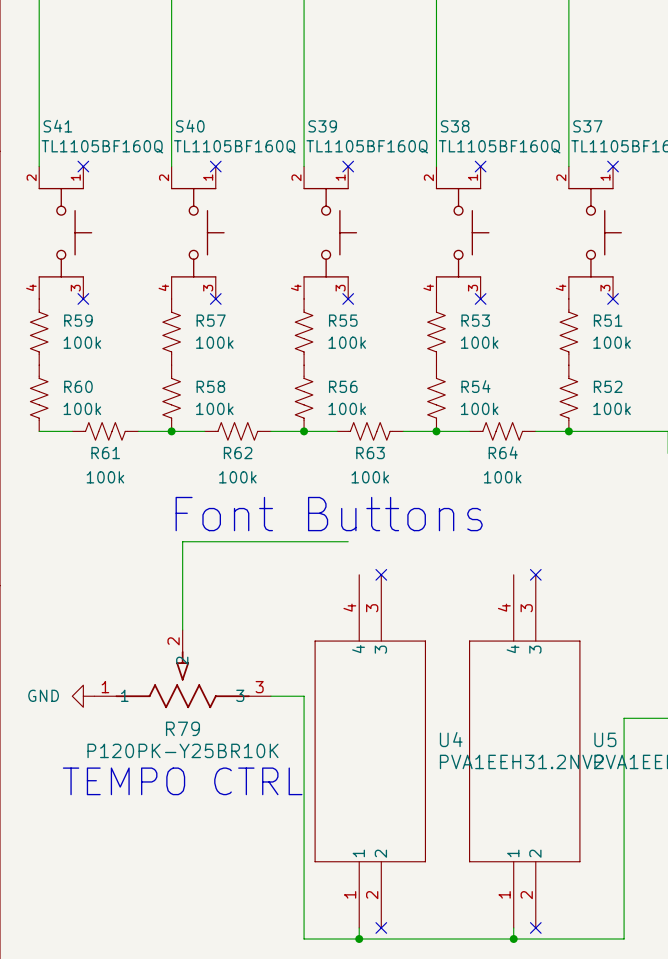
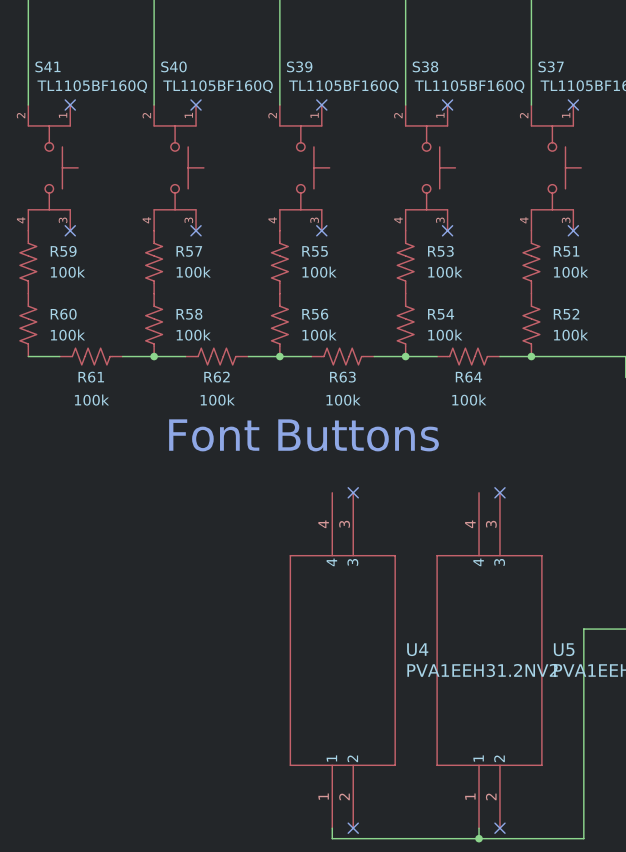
wire: (348, 541) (182, 541) (182, 630) -> none
R79: P120PK-Y25BR10K (182, 669) -> none
power symbol: GND (83, 696) -> none
wire: (270, 696) (304, 696) (304, 939) (359, 939) -> none
text: TEMPO CTRL (182, 781) -> none
junction: (359, 939) -> none

